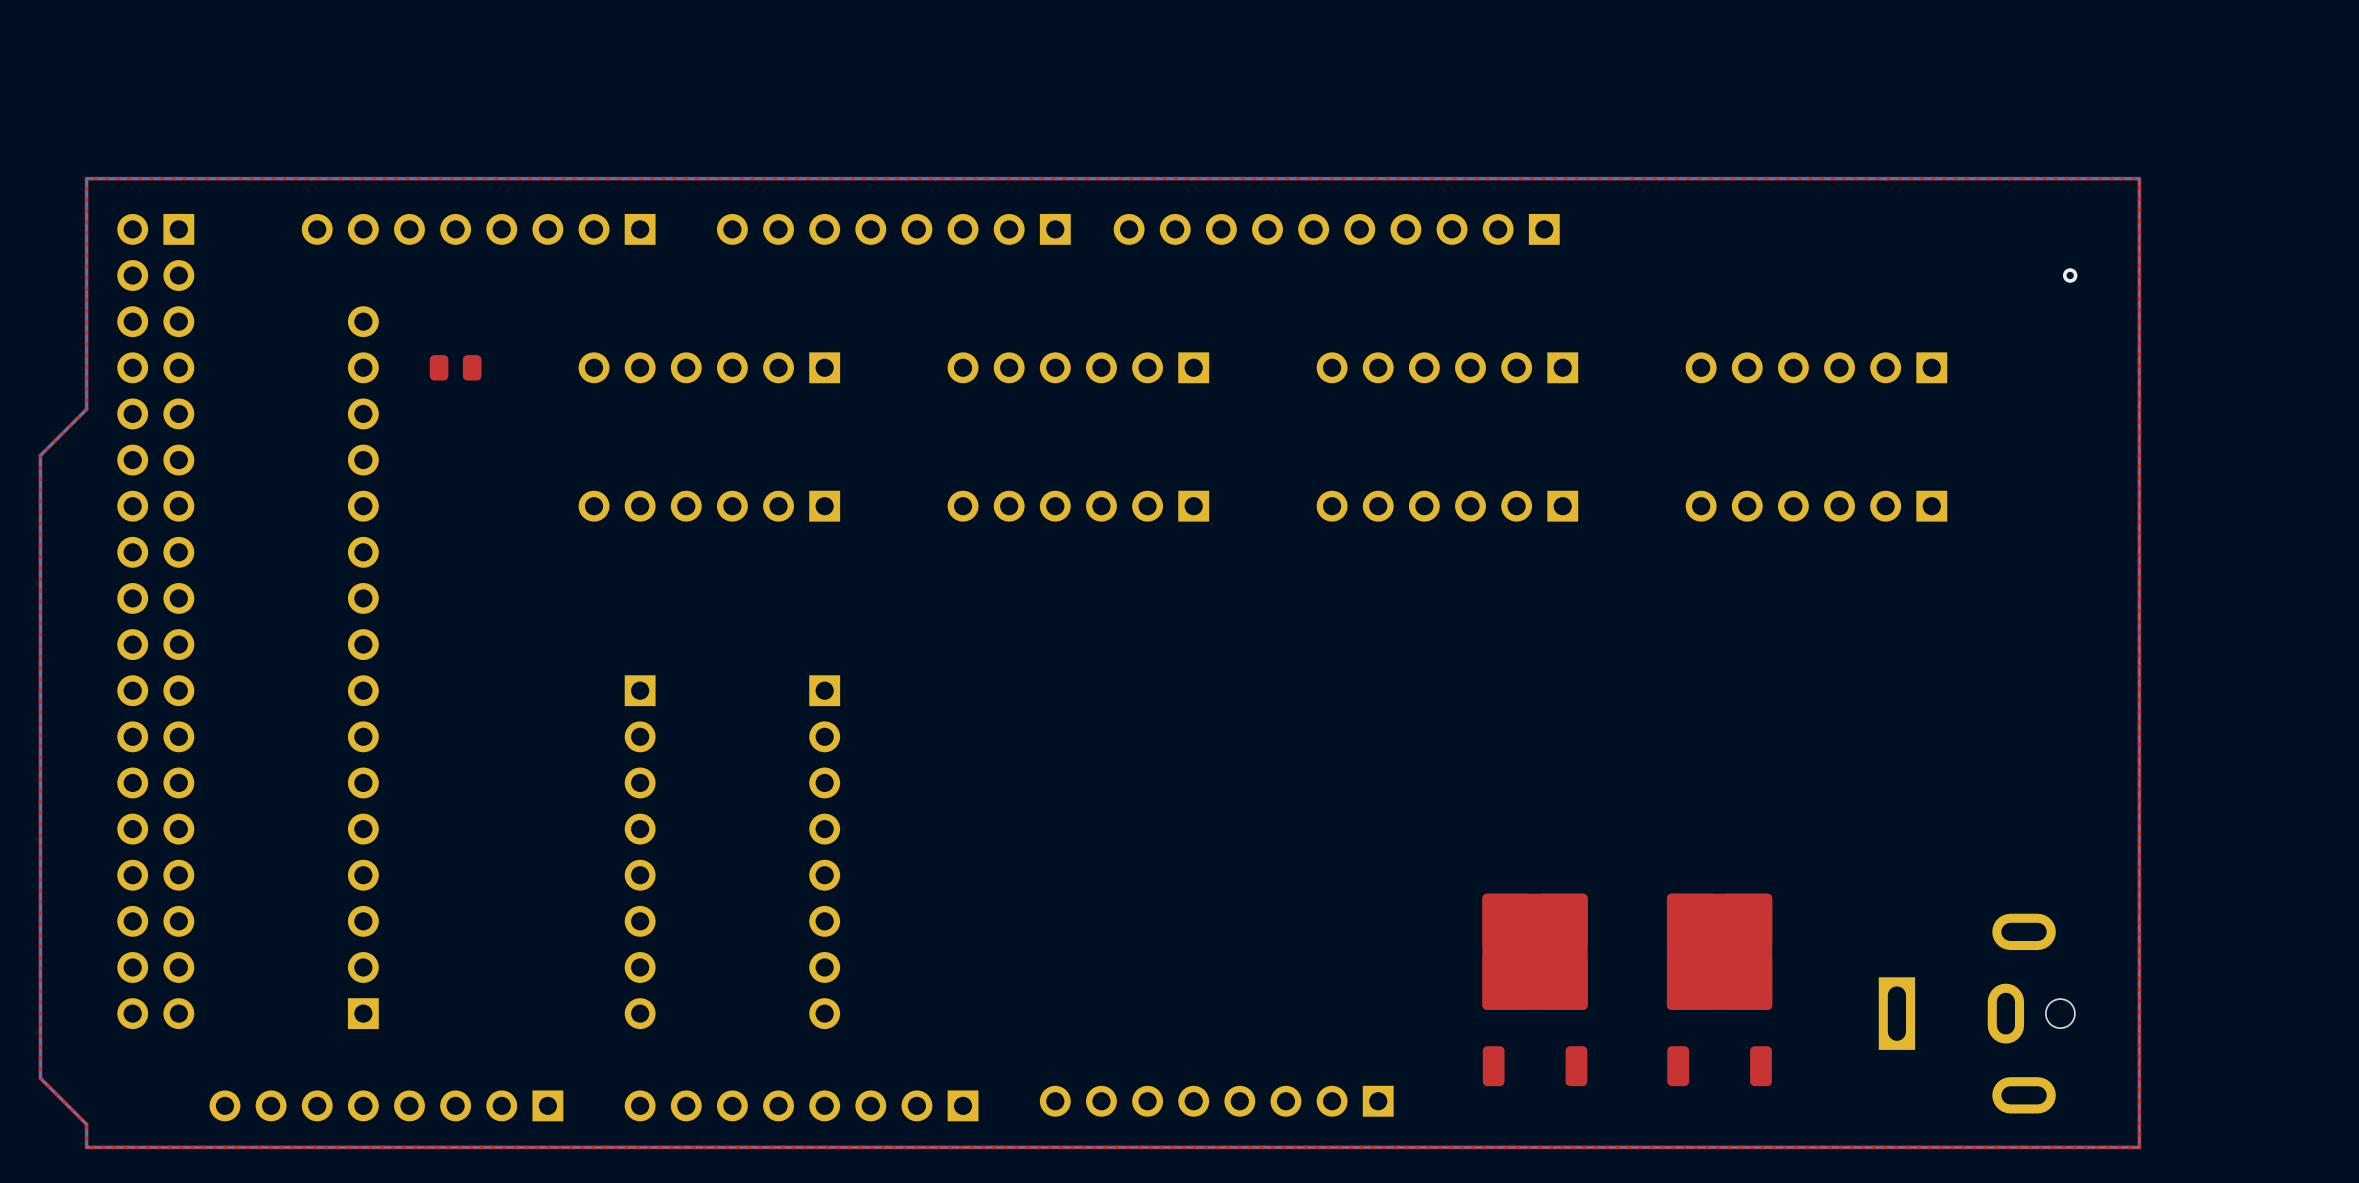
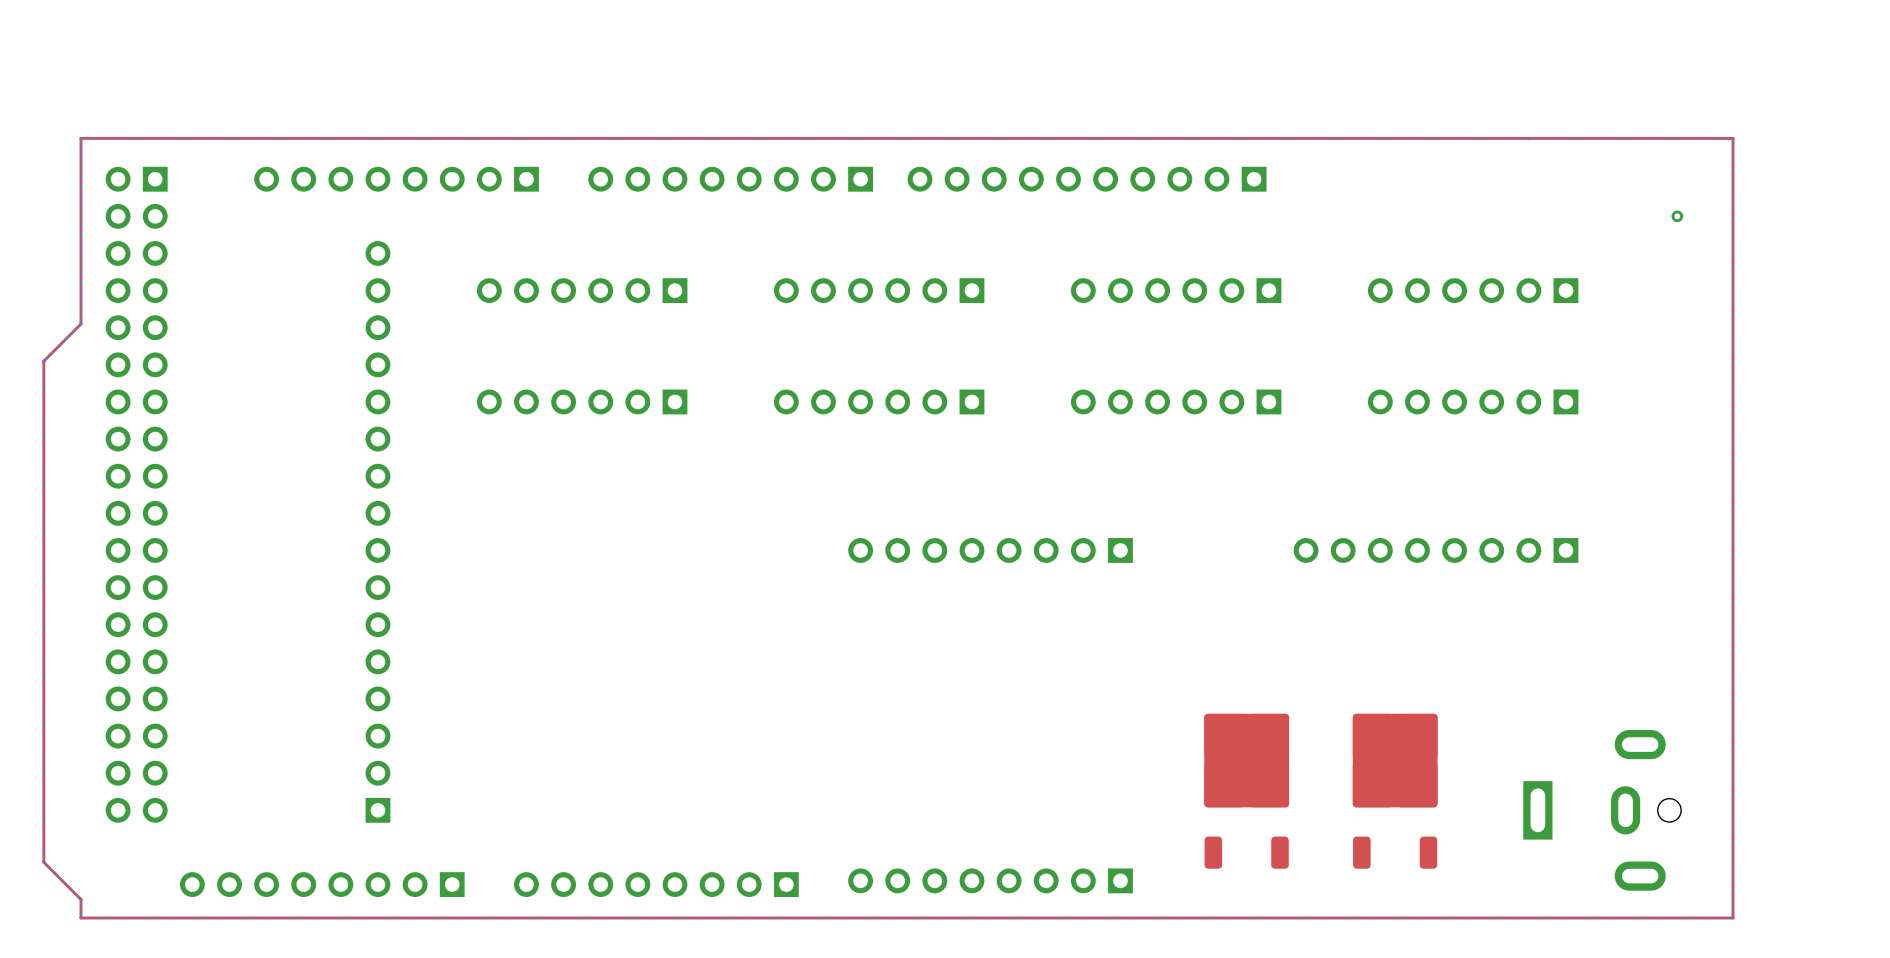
part: (455, 367) -> none
part position: (363, 667) -> (377, 531)
part: none -> (990, 550)
part: none -> (1436, 550)
part: (640, 852) -> none
part: (824, 852) -> none

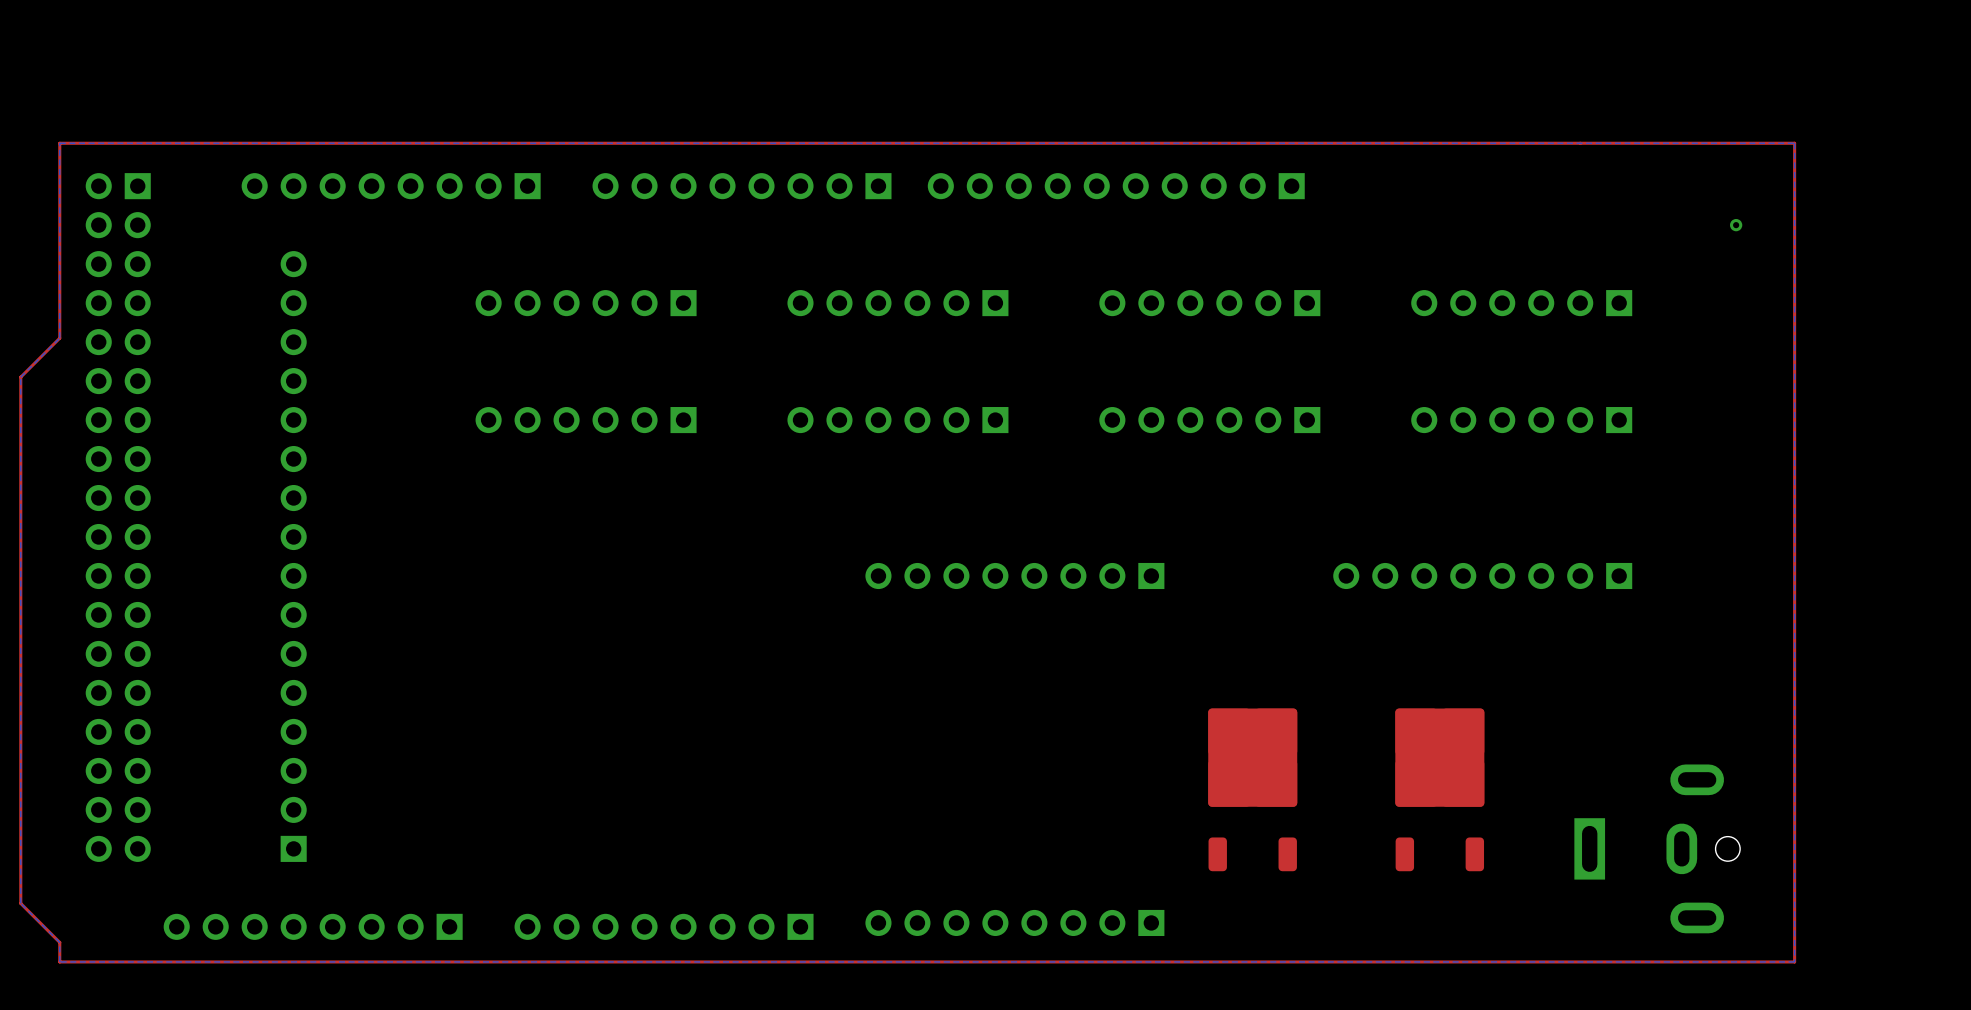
part position: (377, 531) -> (293, 556)
part position: (1246, 791) -> (1252, 789)
part position: (1395, 791) -> (1439, 789)

